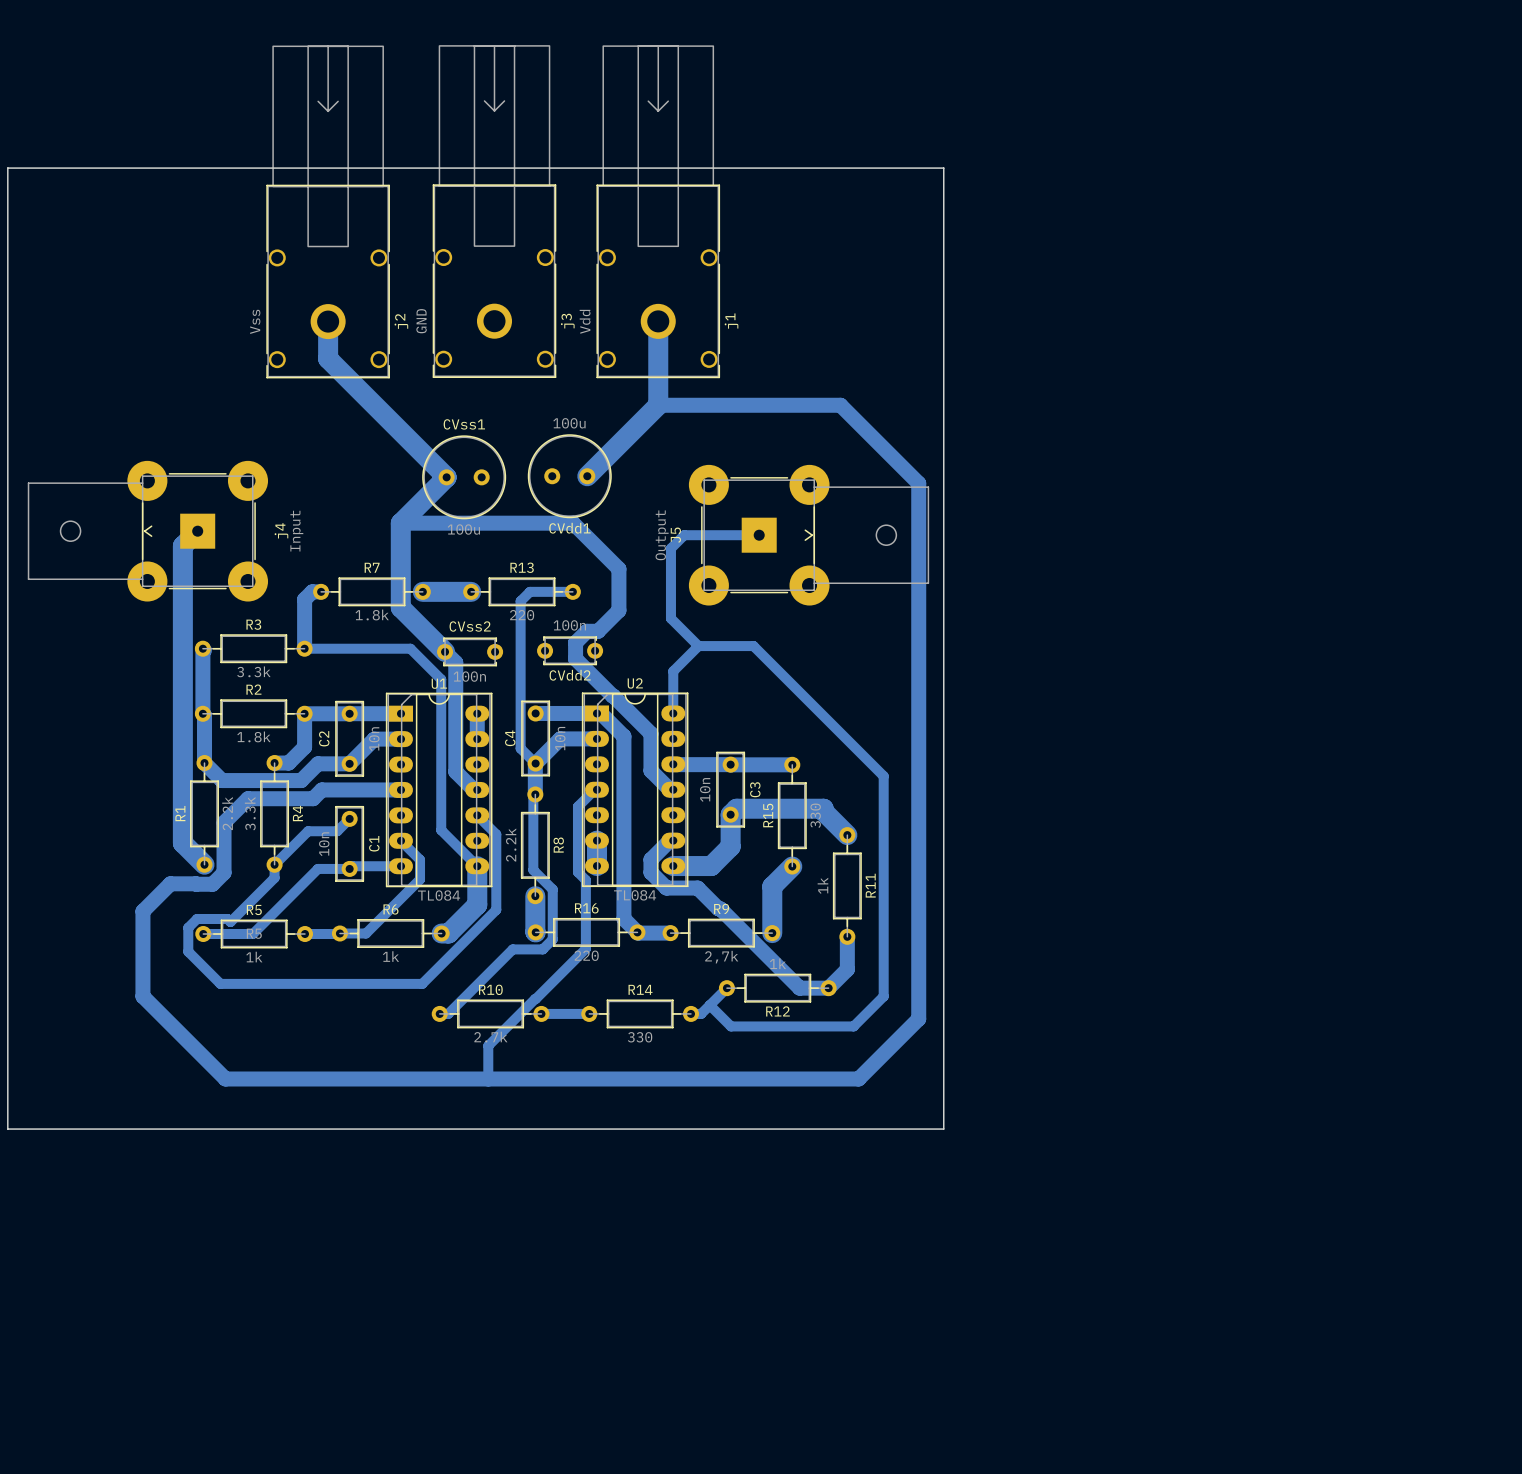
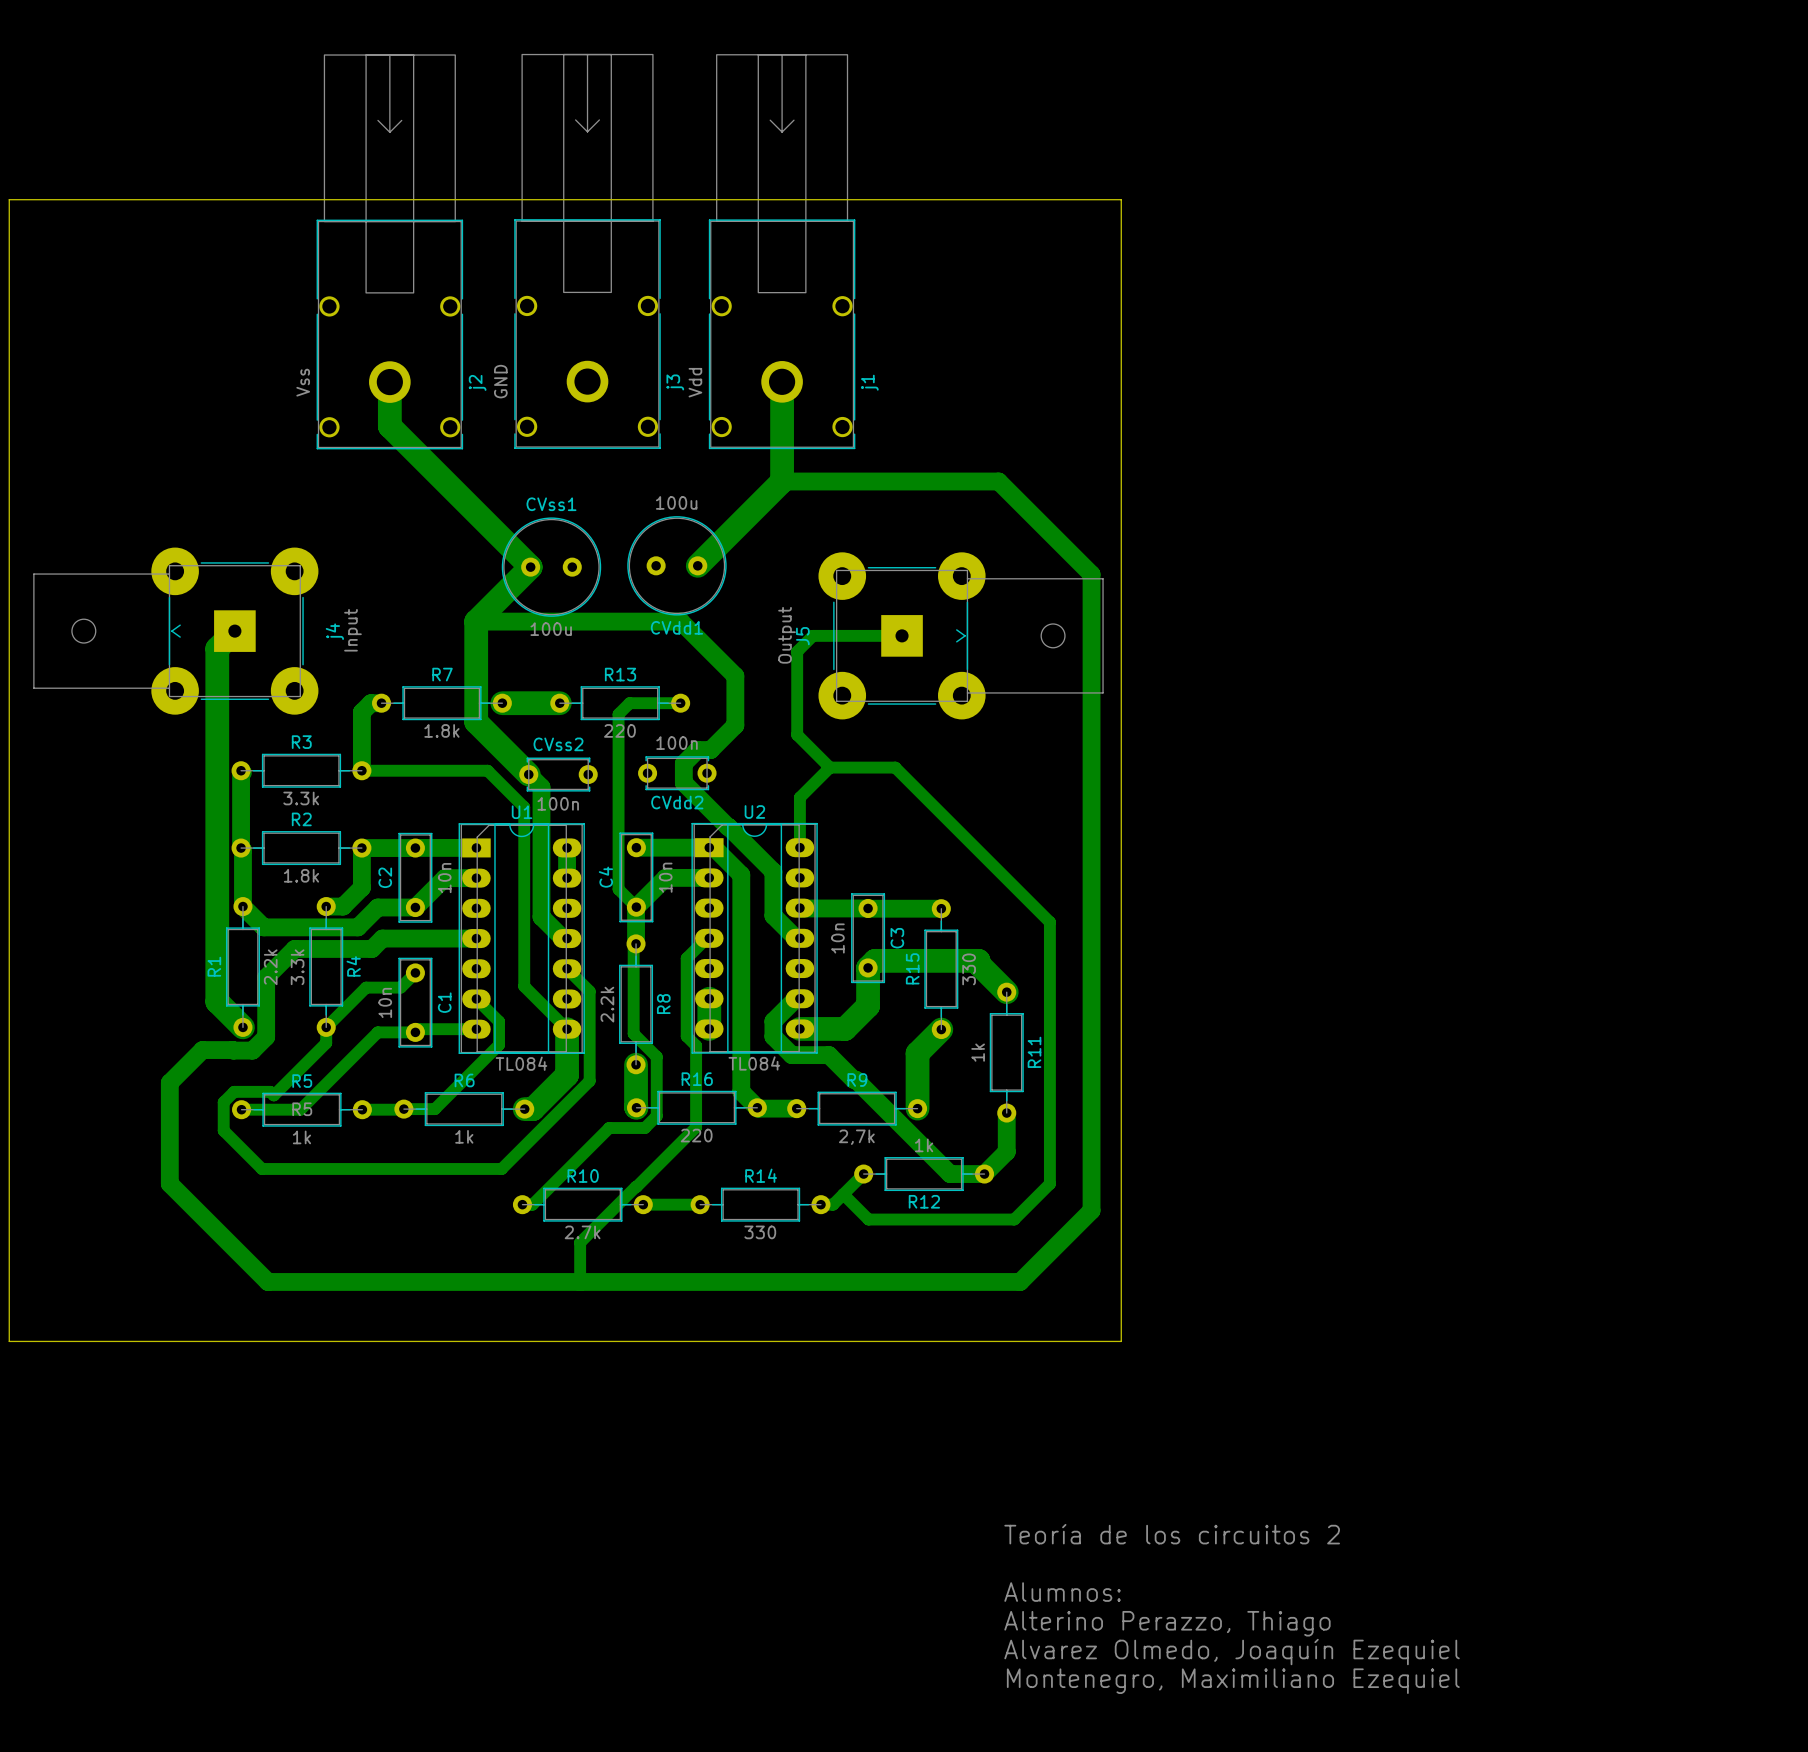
text: none -> Teoría de los circuitos 2 (1172, 1534)
text: none -> Alumnos: (1062, 1592)
text: none -> Alterino Perazzo, Thiago (1167, 1623)
text: none -> Alvarez Olmedo, Joaquín Ezequiel (1232, 1652)
text: none -> Montenegro, Maximiliano Ezequiel (1233, 1681)

